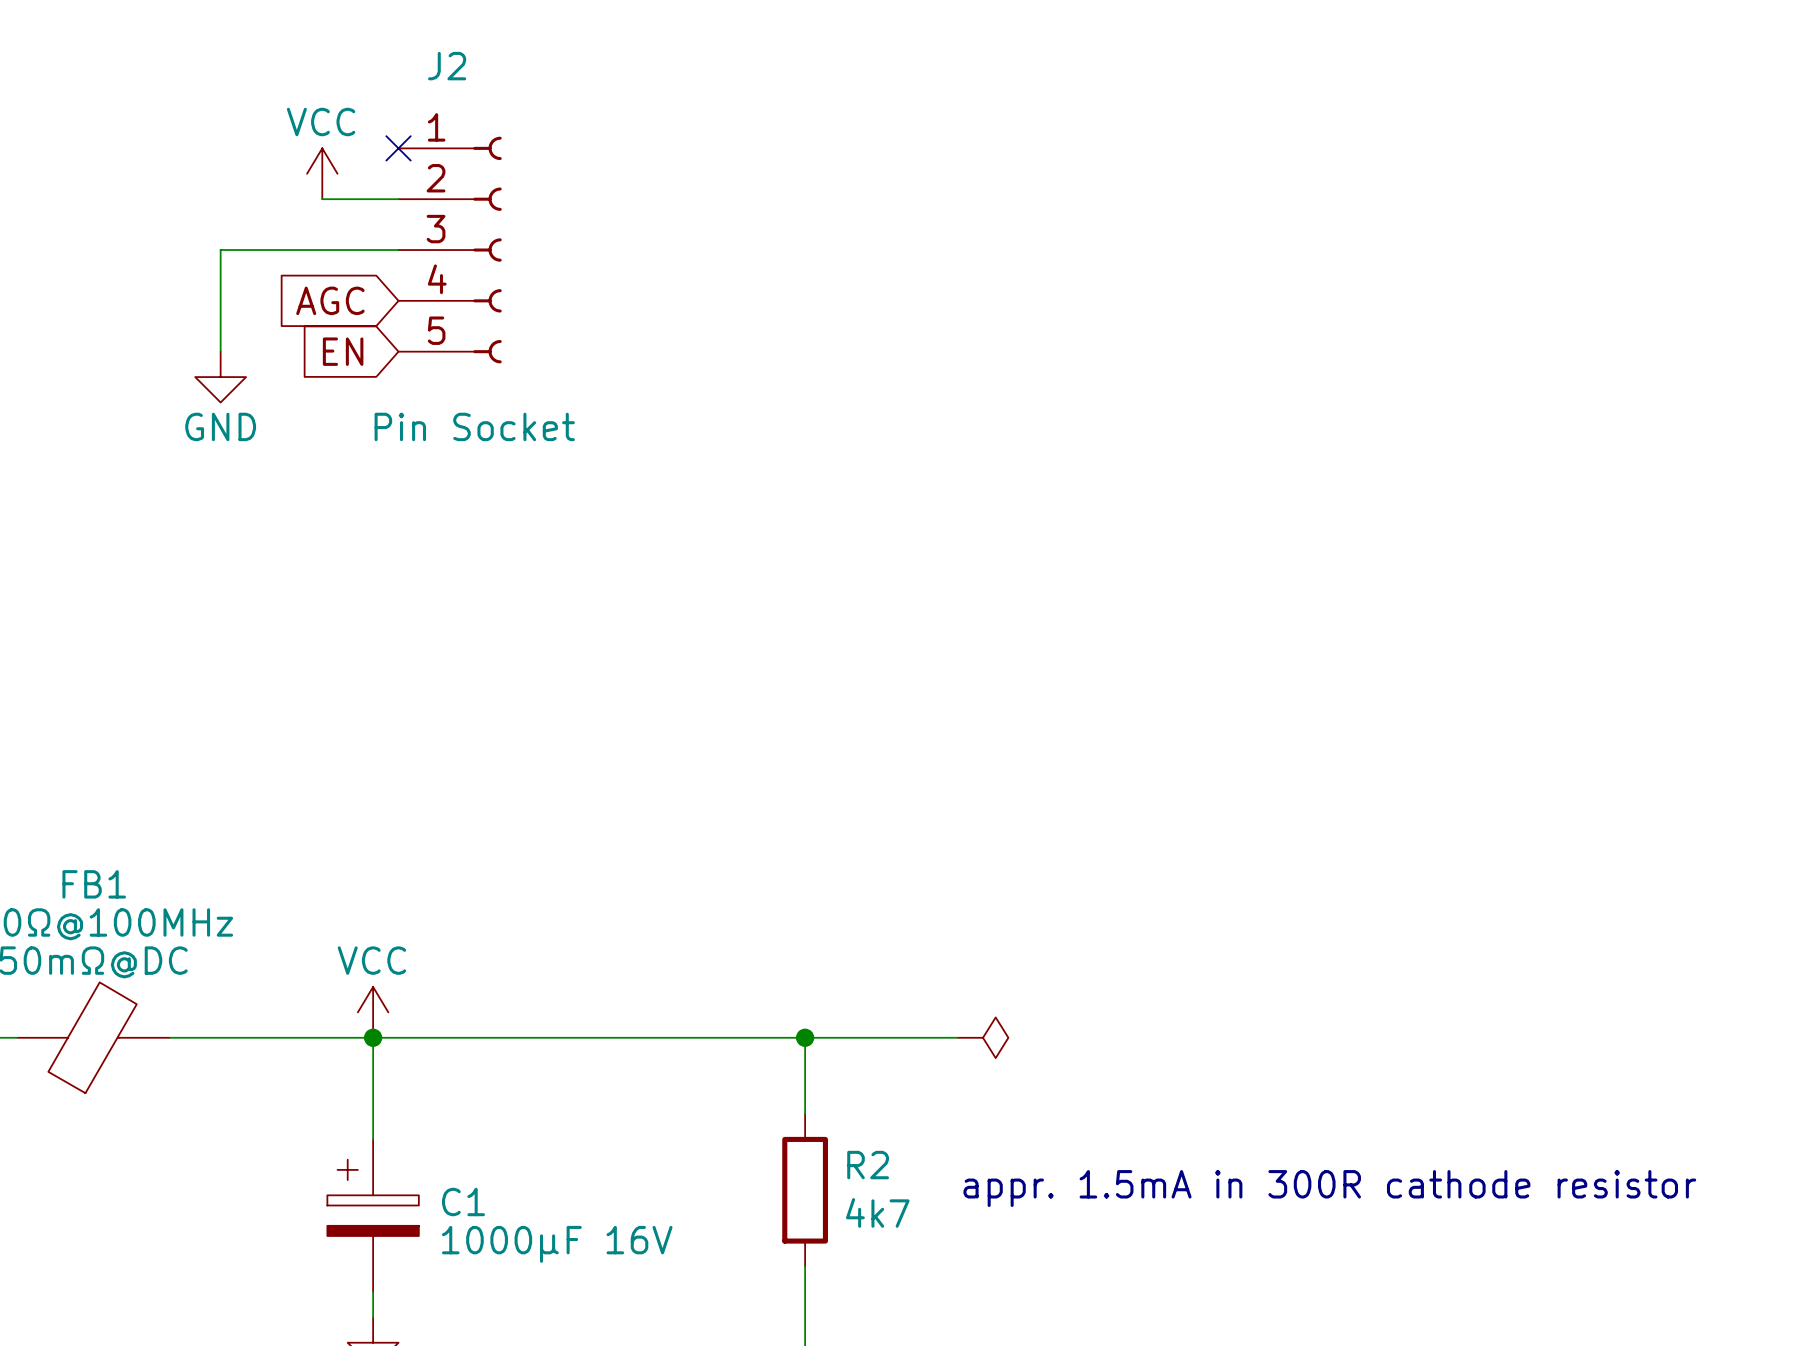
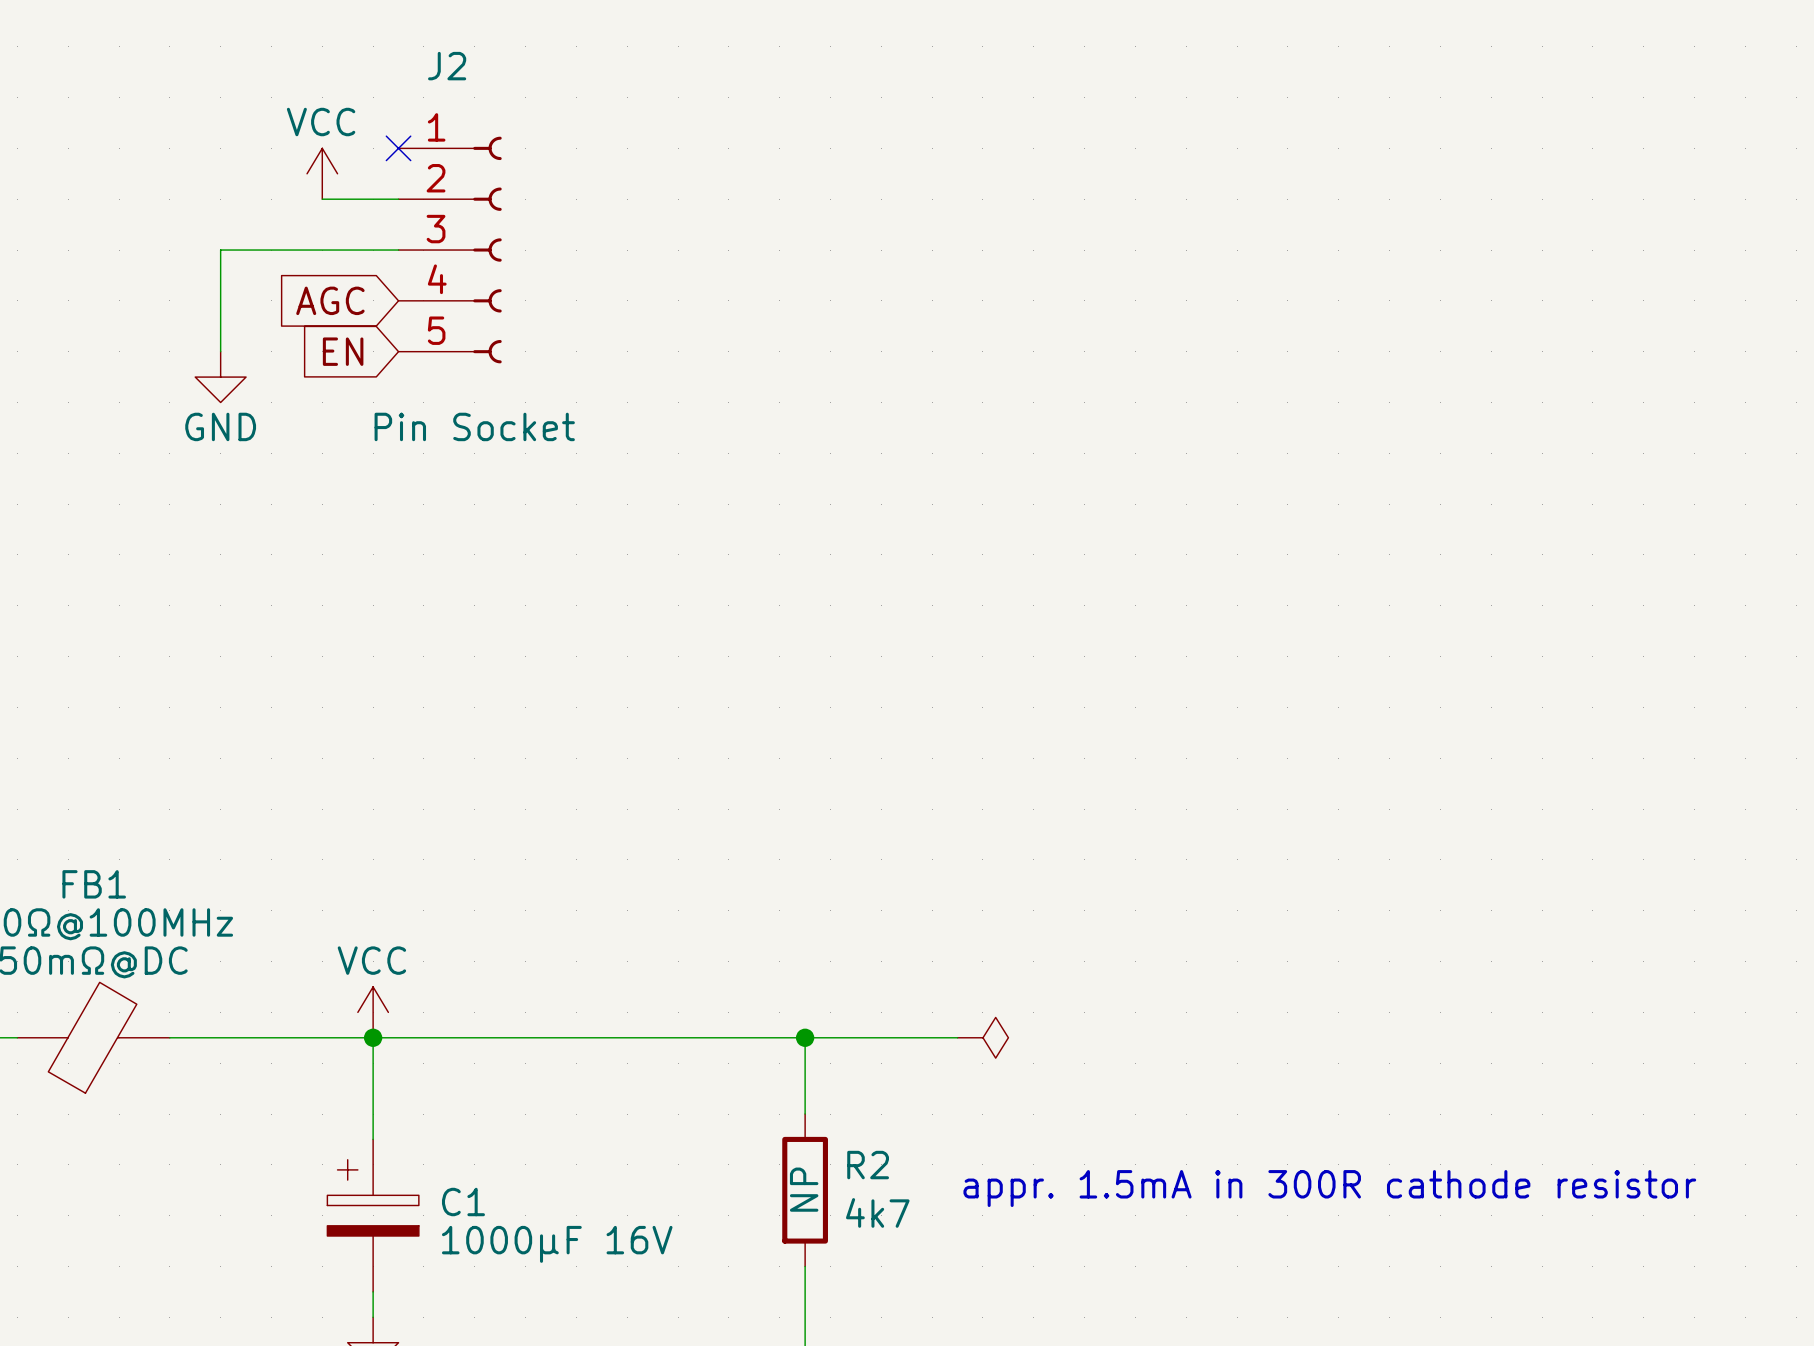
R2 text: none -> NP (804, 1189)

